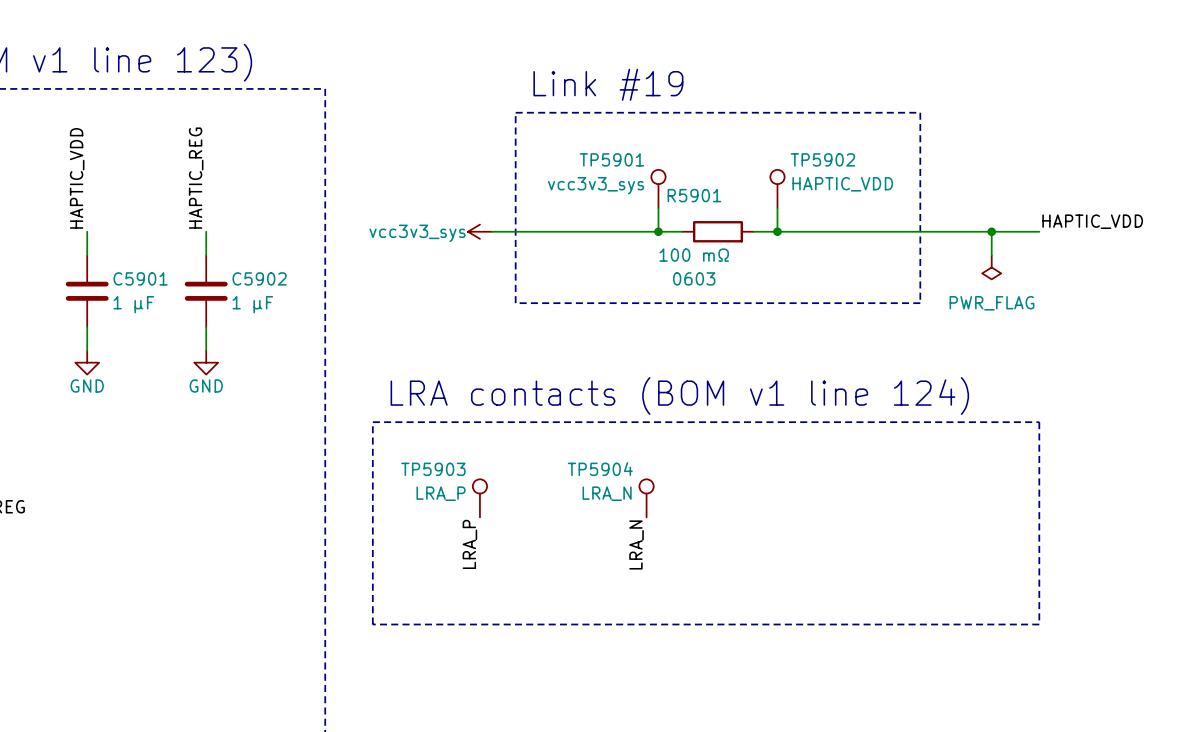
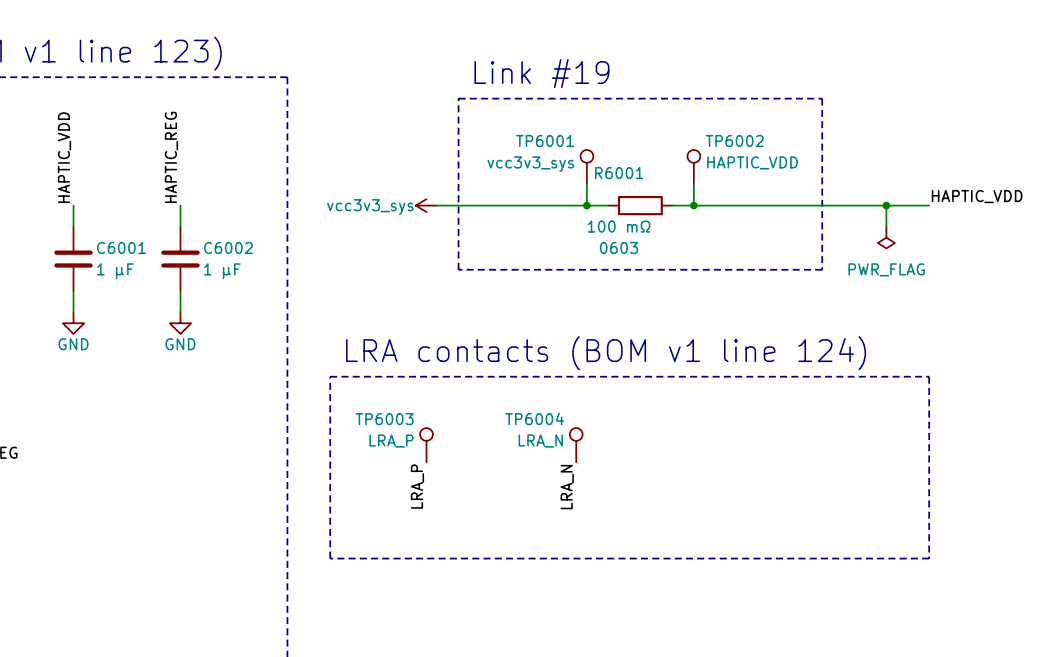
TP5901 name: TP5901 (611, 159) -> TP6001 (545, 141)
TP5902 name: TP5902 (822, 159) -> TP6002 (734, 141)
R5901 name: R5901 (694, 195) -> R6001 (619, 173)
C5901 name: C5901 (140, 278) -> C6001 (121, 247)
C5902 name: C5902 (259, 278) -> C6002 (228, 247)
TP5903 name: TP5903 (433, 469) -> TP6003 (384, 419)
TP5904 name: TP5904 (600, 469) -> TP6004 (534, 418)

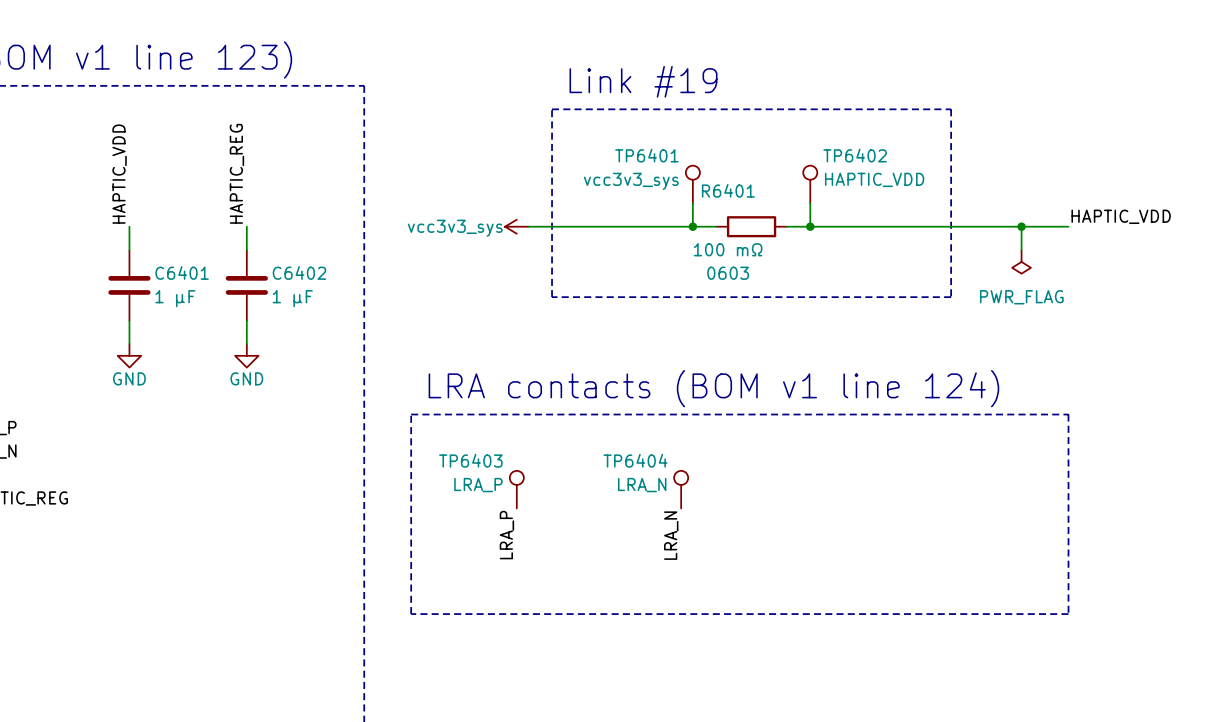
TP6001 name: TP6001 (545, 141) -> TP6401 (646, 155)
TP6002 name: TP6002 (734, 141) -> TP6402 (855, 155)
R6001 name: R6001 (619, 173) -> R6401 (728, 190)
C6001 name: C6001 (121, 247) -> C6401 (182, 272)
C6002 name: C6002 (228, 247) -> C6402 (299, 272)
TP6004 name: TP6004 (534, 418) -> TP6404 (635, 460)
TP6003 name: TP6003 (384, 419) -> TP6403 (470, 460)

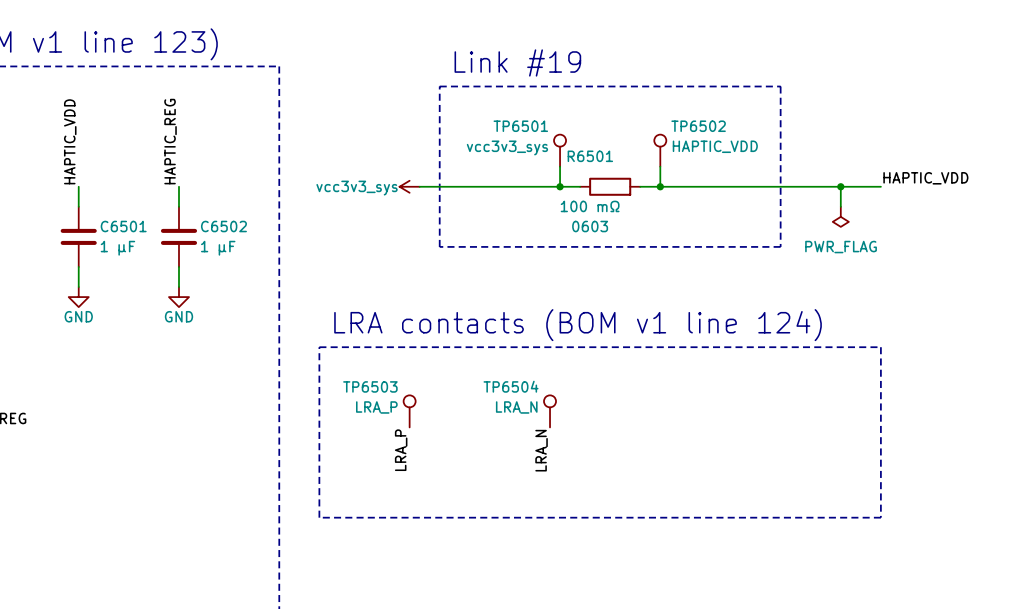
TP6401 name: TP6401 (646, 155) -> TP6501 (520, 126)
TP6402 name: TP6402 (855, 155) -> TP6502 (698, 126)
R6401 name: R6401 (728, 190) -> R6501 (590, 156)
C6401 name: C6401 (182, 272) -> C6501 (123, 226)
C6402 name: C6402 (299, 272) -> C6502 (223, 226)
TP6403 name: TP6403 (470, 460) -> TP6503 (370, 386)
TP6404 name: TP6404 (635, 460) -> TP6504 (511, 386)

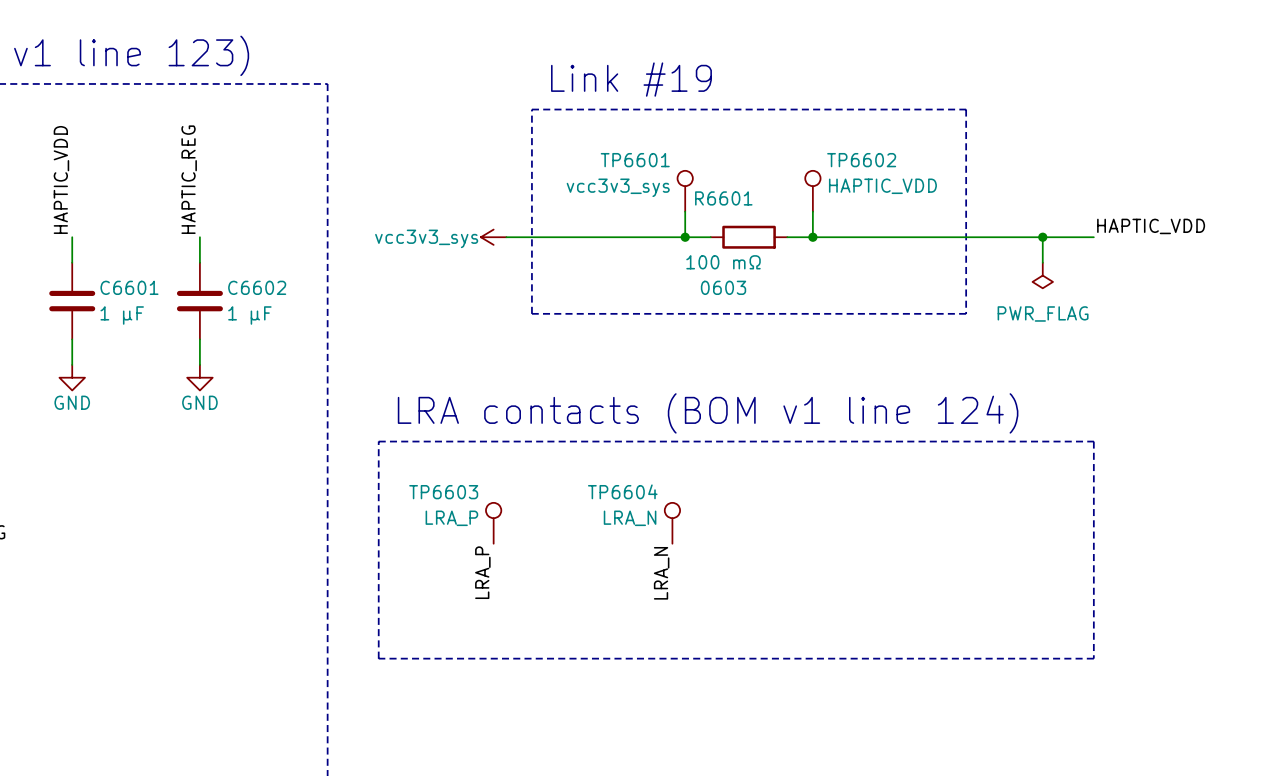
TP6501 name: TP6501 (520, 126) -> TP6601 (635, 160)
TP6502 name: TP6502 (698, 126) -> TP6602 (861, 160)
R6501 name: R6501 (590, 156) -> R6601 (723, 198)
C6501 name: C6501 (123, 226) -> C6601 (129, 287)
C6502 name: C6502 (223, 226) -> C6602 (257, 287)
TP6503 name: TP6503 (370, 386) -> TP6603 (443, 492)
TP6504 name: TP6504 (511, 386) -> TP6604 (622, 491)

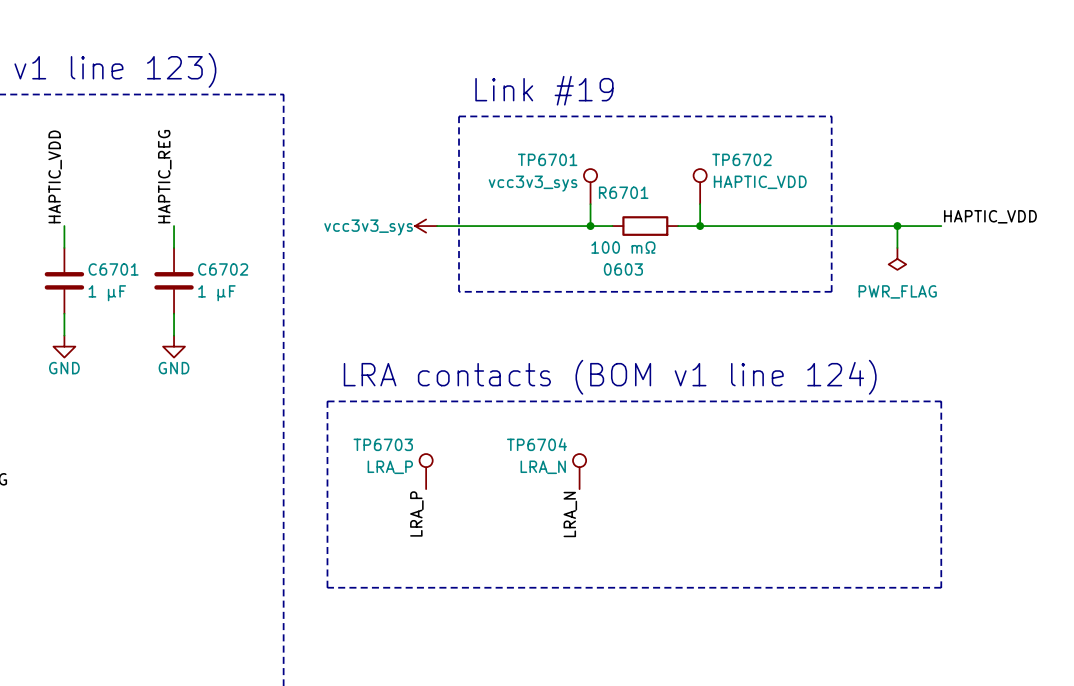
TP6601 name: TP6601 (635, 160) -> TP6701 (547, 159)
TP6602 name: TP6602 (861, 160) -> TP6702 (741, 159)
R6601 name: R6601 (723, 198) -> R6701 (623, 192)
C6601 name: C6601 (129, 287) -> C6701 (113, 269)
C6602 name: C6602 (257, 287) -> C6702 (223, 269)
TP6604 name: TP6604 (622, 491) -> TP6704 (536, 444)
TP6603 name: TP6603 (443, 492) -> TP6703 (383, 444)

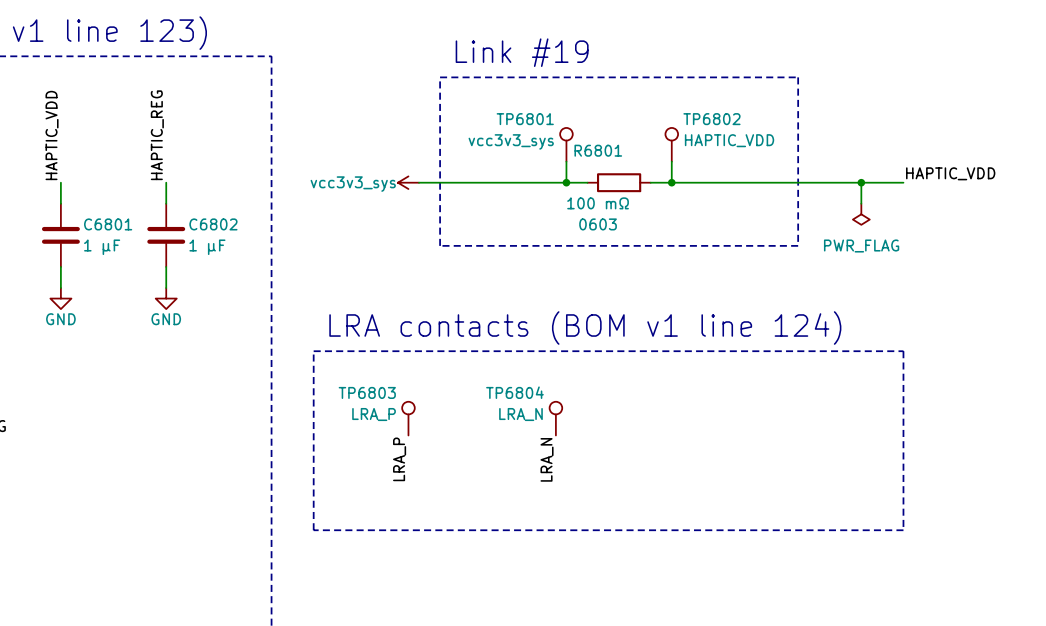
TP6701 name: TP6701 (547, 159) -> TP6801 (525, 119)
TP6702 name: TP6702 (741, 159) -> TP6802 (711, 119)
R6701 name: R6701 (623, 192) -> R6801 (598, 150)
C6701 name: C6701 (113, 269) -> C6801 (108, 224)
C6702 name: C6702 (223, 269) -> C6802 (213, 224)
TP6703 name: TP6703 (383, 444) -> TP6803 (367, 392)
TP6704 name: TP6704 (536, 444) -> TP6804 (514, 392)

